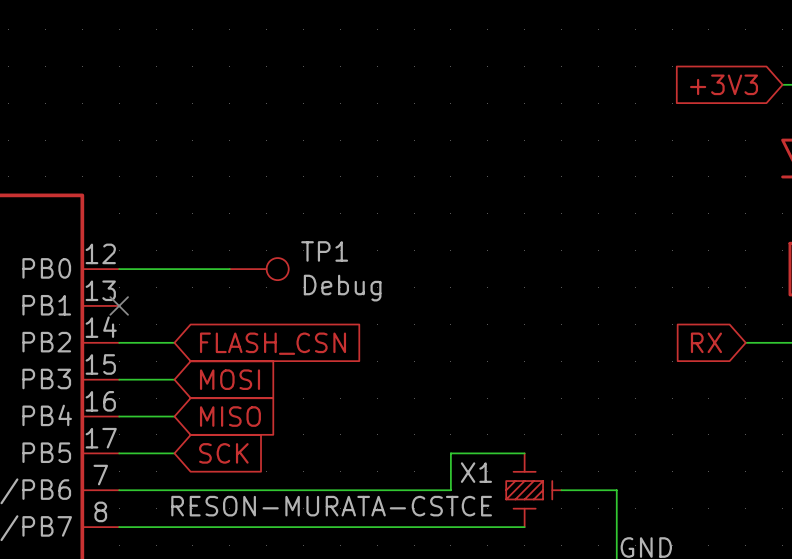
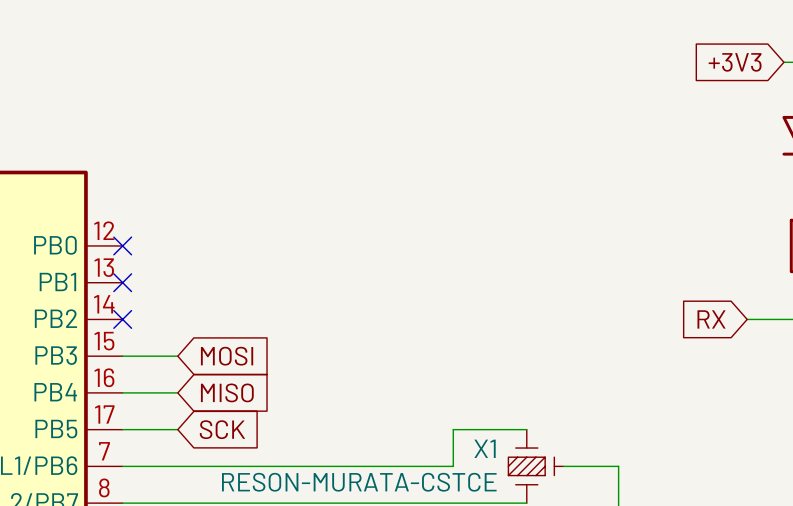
wire: (119, 269) (229, 269) -> none
no-connect mark: none -> (122, 245)
TP1: Debug (259, 269) -> none
wire: (119, 342) (174, 342) -> none
no-connect mark: none -> (122, 319)
global label: FLASH_CSN (273, 343) -> none

